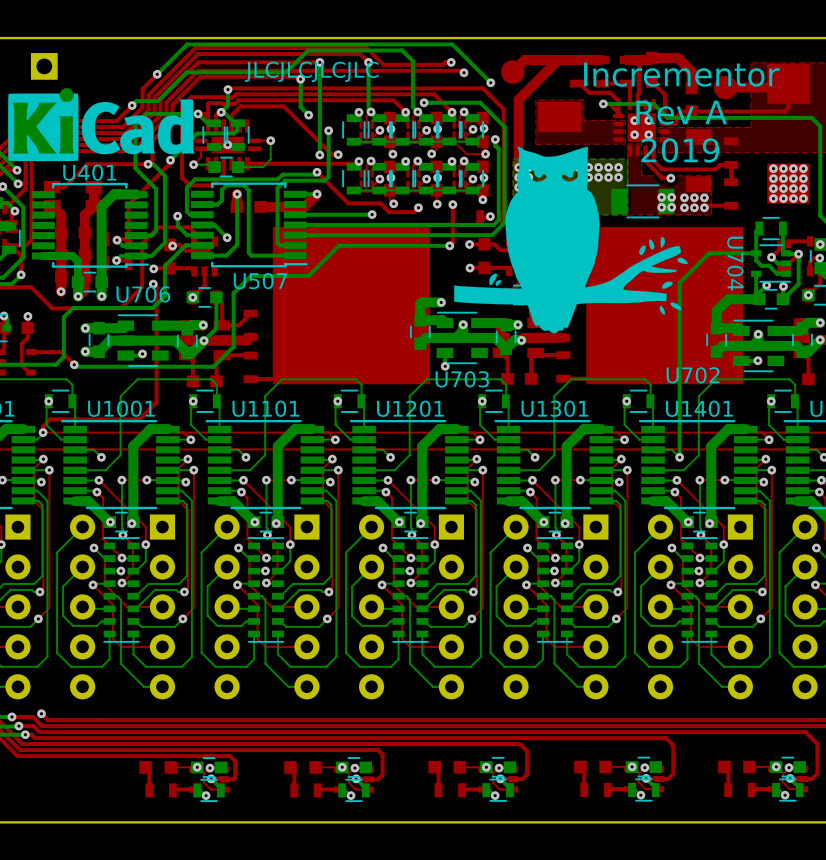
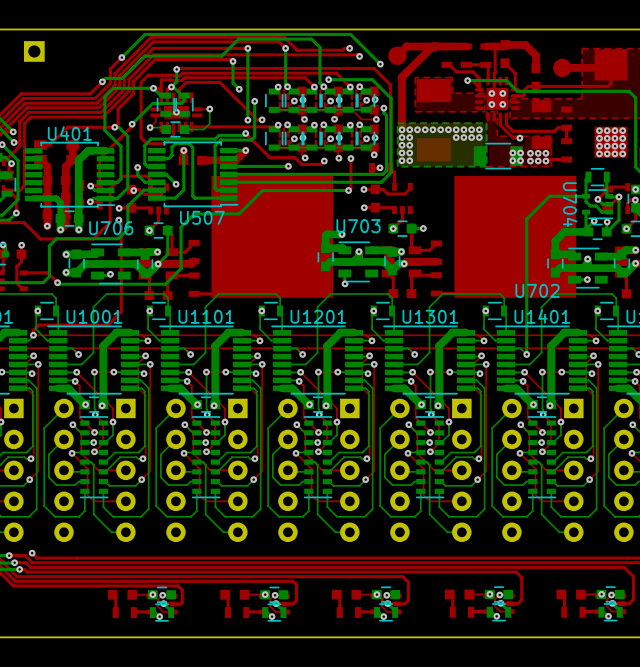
text: JLCJLCJLCJLC (311, 71) -> none
text: Incrementor (681, 74) -> none
drawing: [8, 88, 195, 162] -> none
text: Rev A (681, 112) -> none
drawing: [454, 146, 688, 334] -> none
text: 2019 (680, 150) -> none
U703 name position: U703 (462, 379) -> U703 (358, 226)

